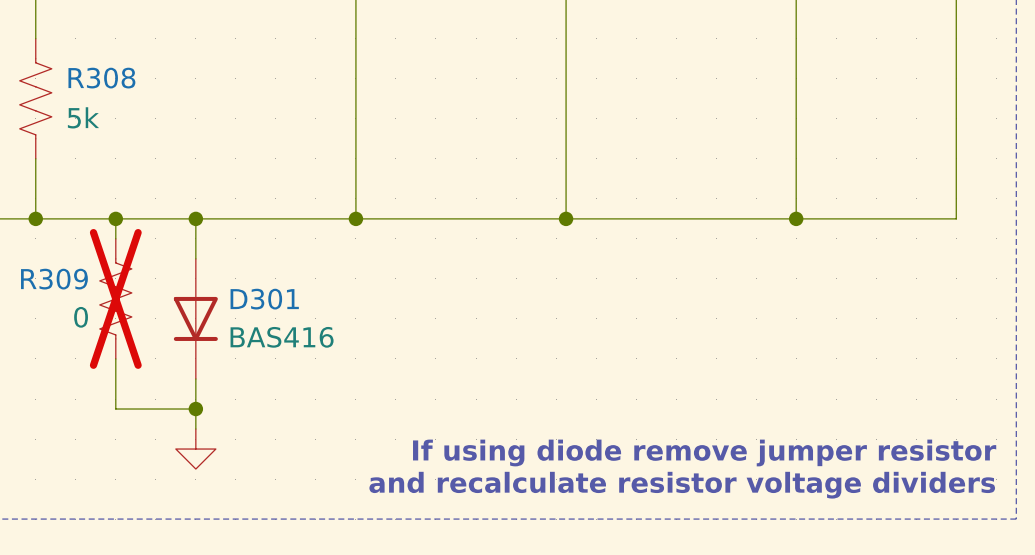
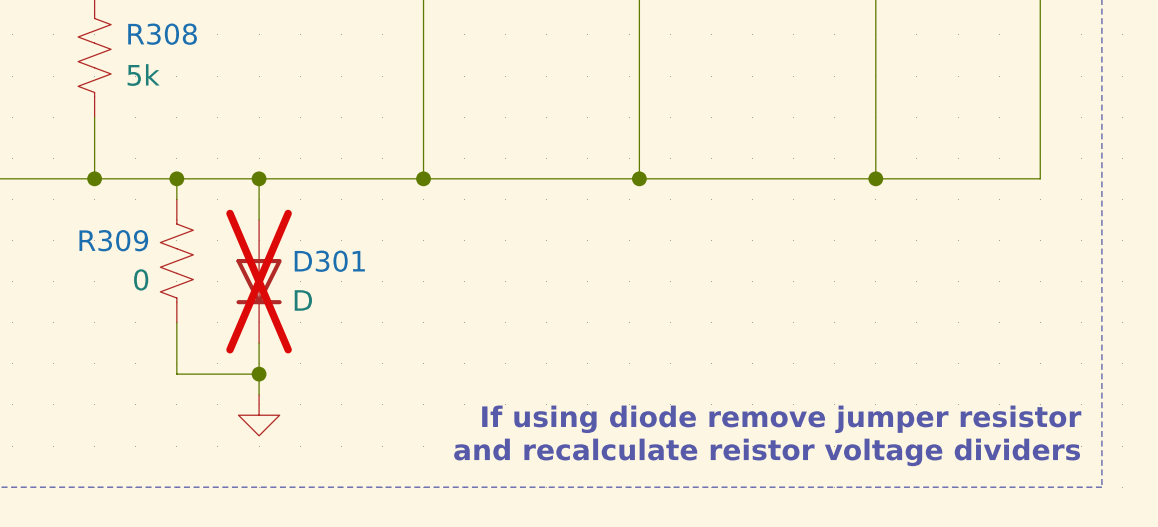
R309 do-not-place cross: (115, 298) -> none
D301 do-not-place cross: none -> (259, 281)
D301 value: BAS416 (282, 337) -> D (303, 300)
text: and recalculate resistor voltage dividers (682, 485) -> and recalculate reistor voltage dividers (767, 452)

